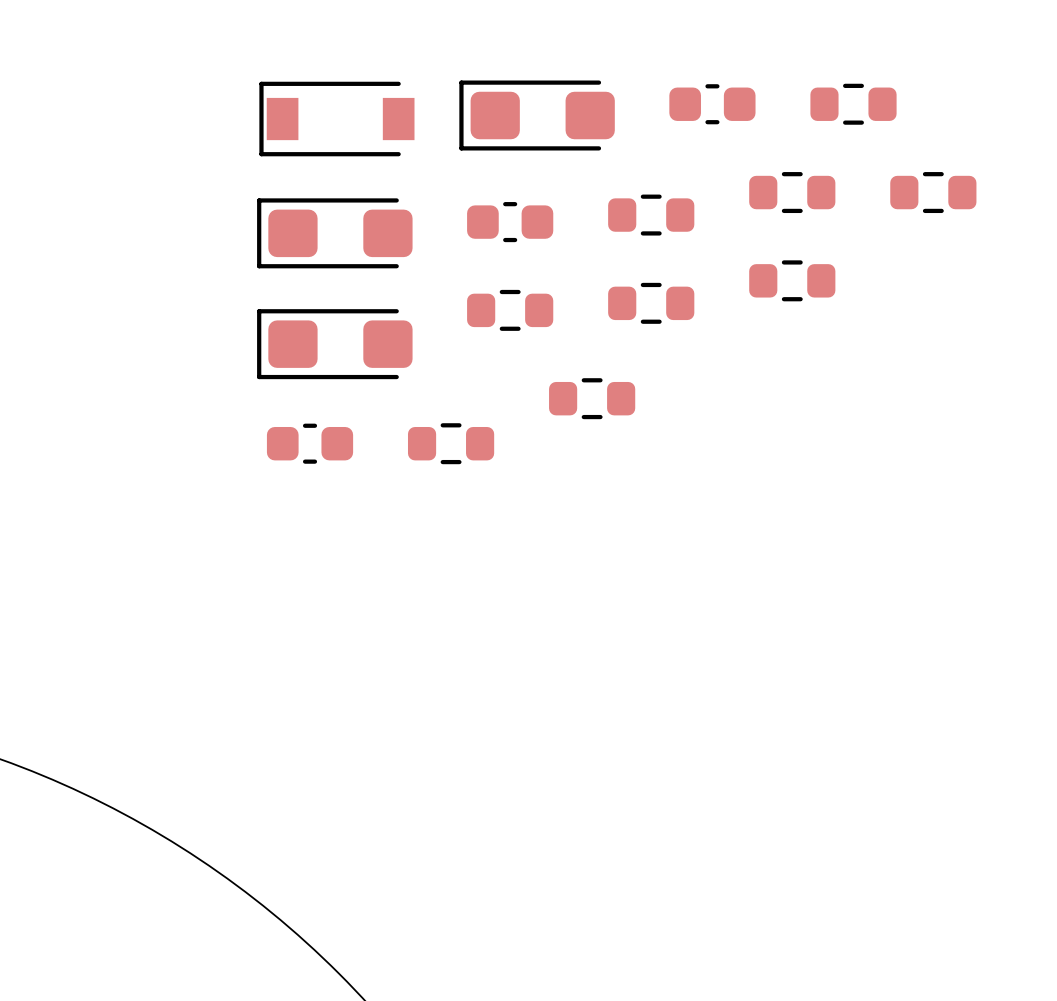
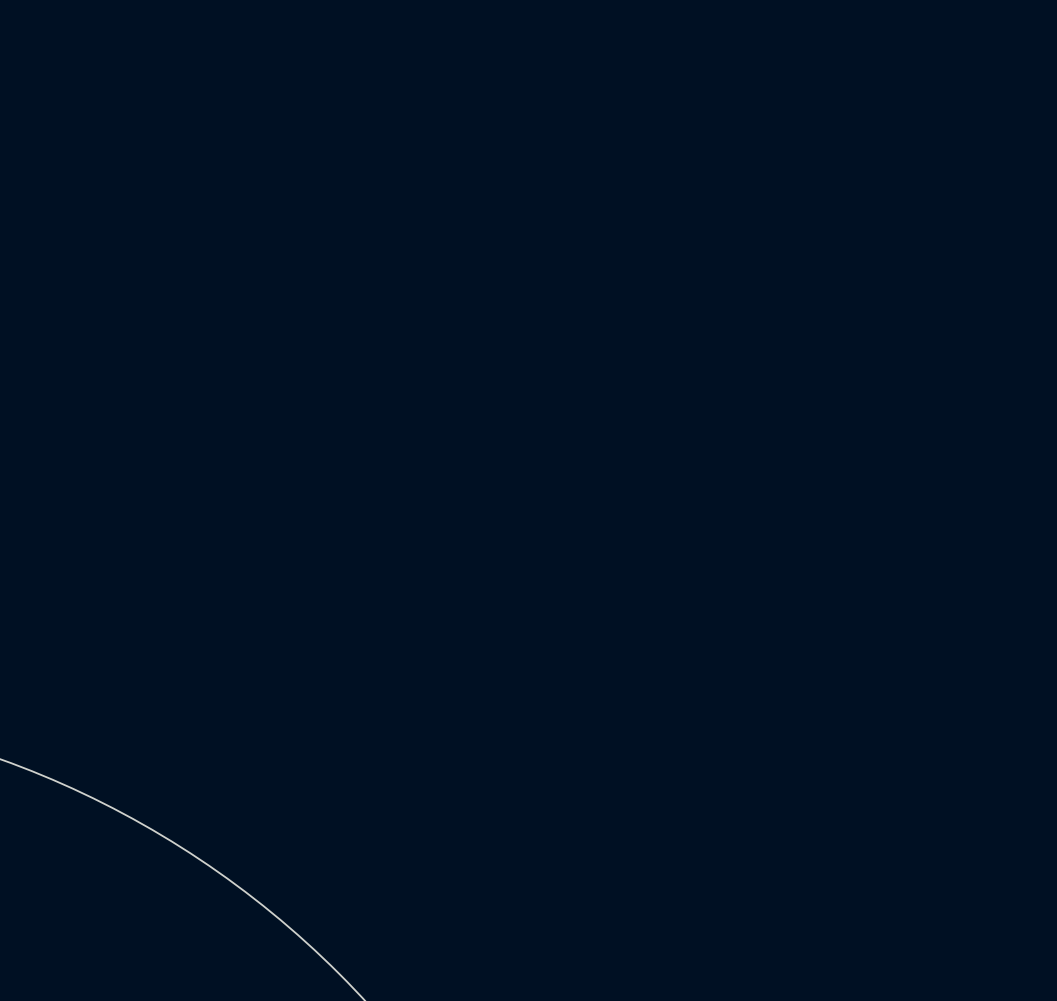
part: (712, 104) -> none
part: (853, 104) -> none
part: (537, 115) -> none
part: (336, 119) -> none
part: (792, 192) -> none
part: (933, 192) -> none
part: (651, 215) -> none
part: (510, 222) -> none
part: (334, 233) -> none
part: (792, 280) -> none
part: (651, 303) -> none
part: (510, 310) -> none
part: (334, 344) -> none
part: (592, 398) -> none
part: (310, 443) -> none
part: (451, 443) -> none

